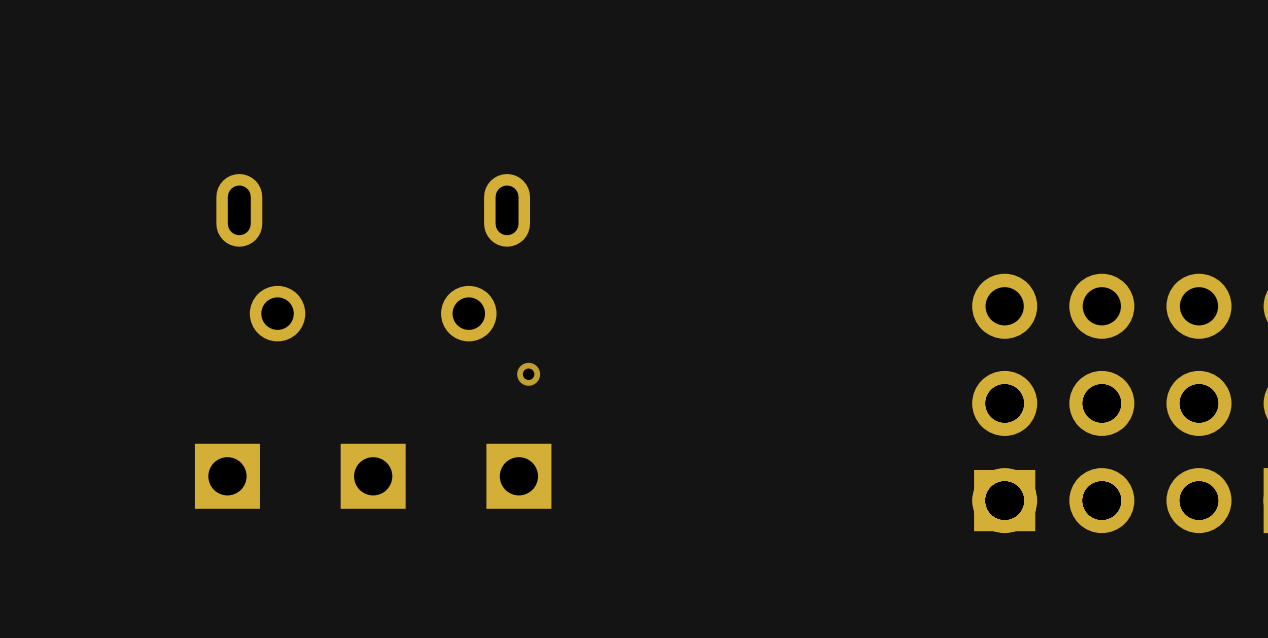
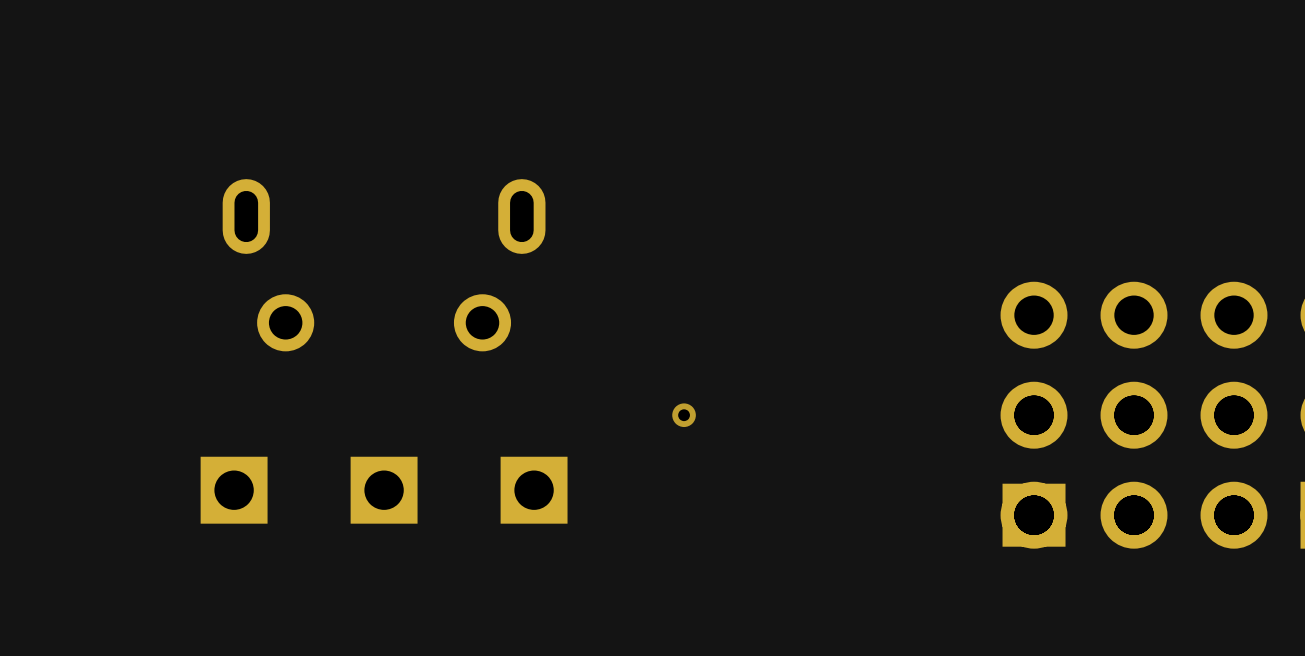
via position: (528, 374) -> (684, 415)

